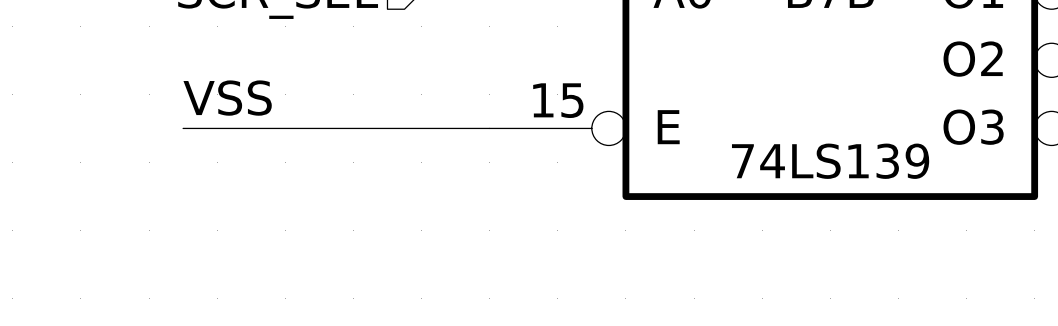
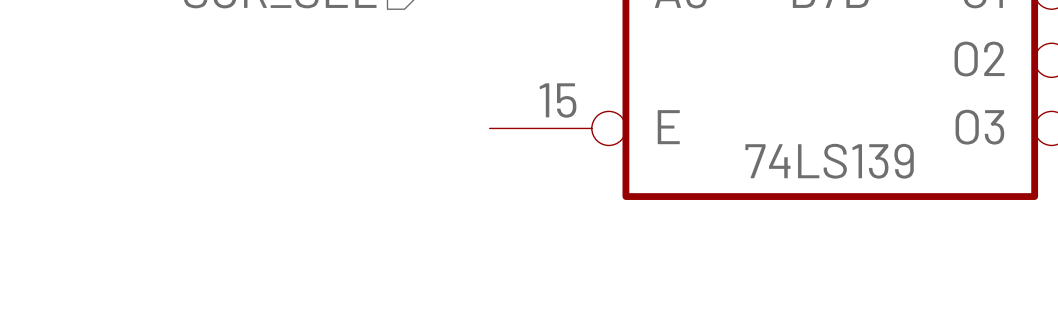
label: VSS (227, 98) -> none
wire: (183, 128) (489, 128) -> none

